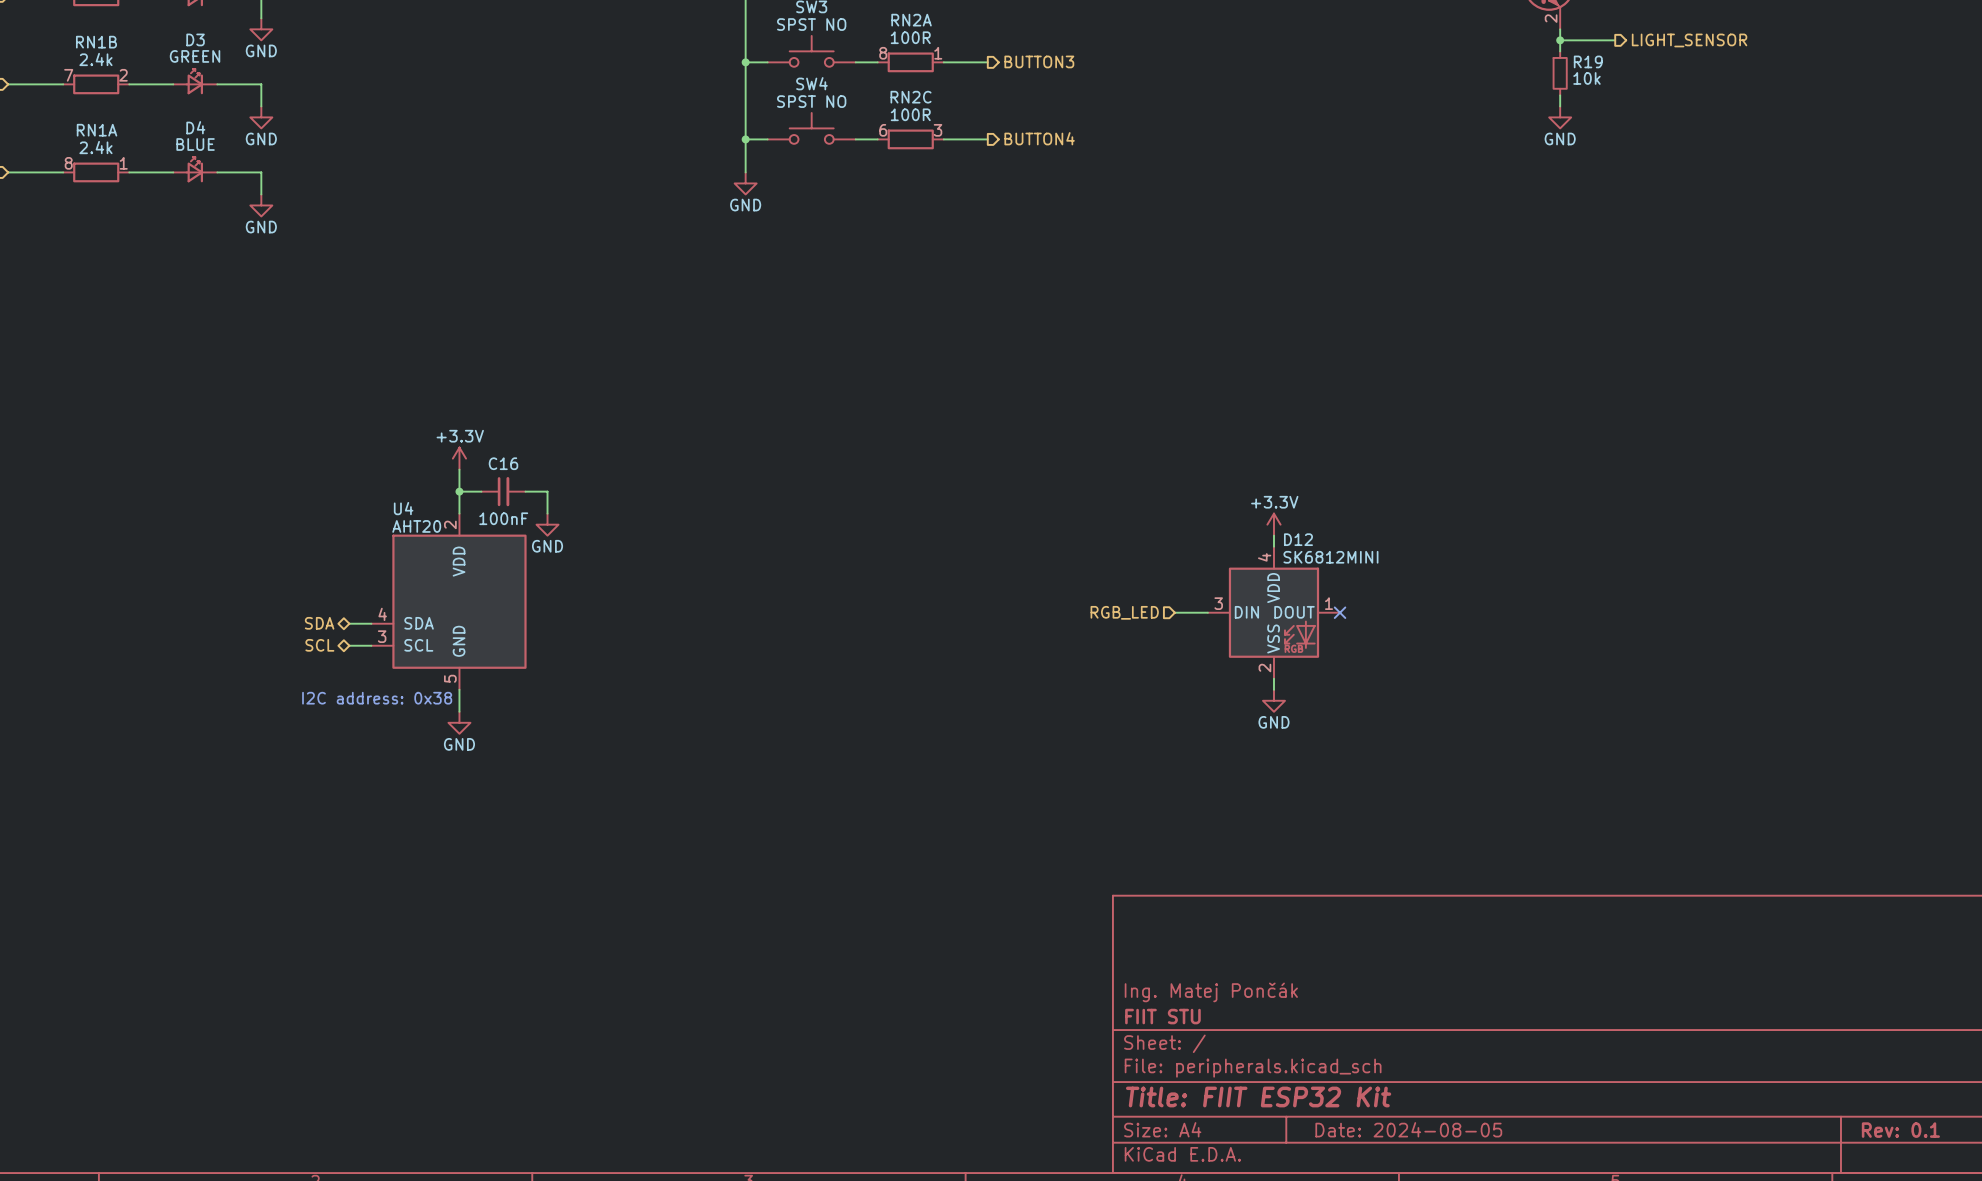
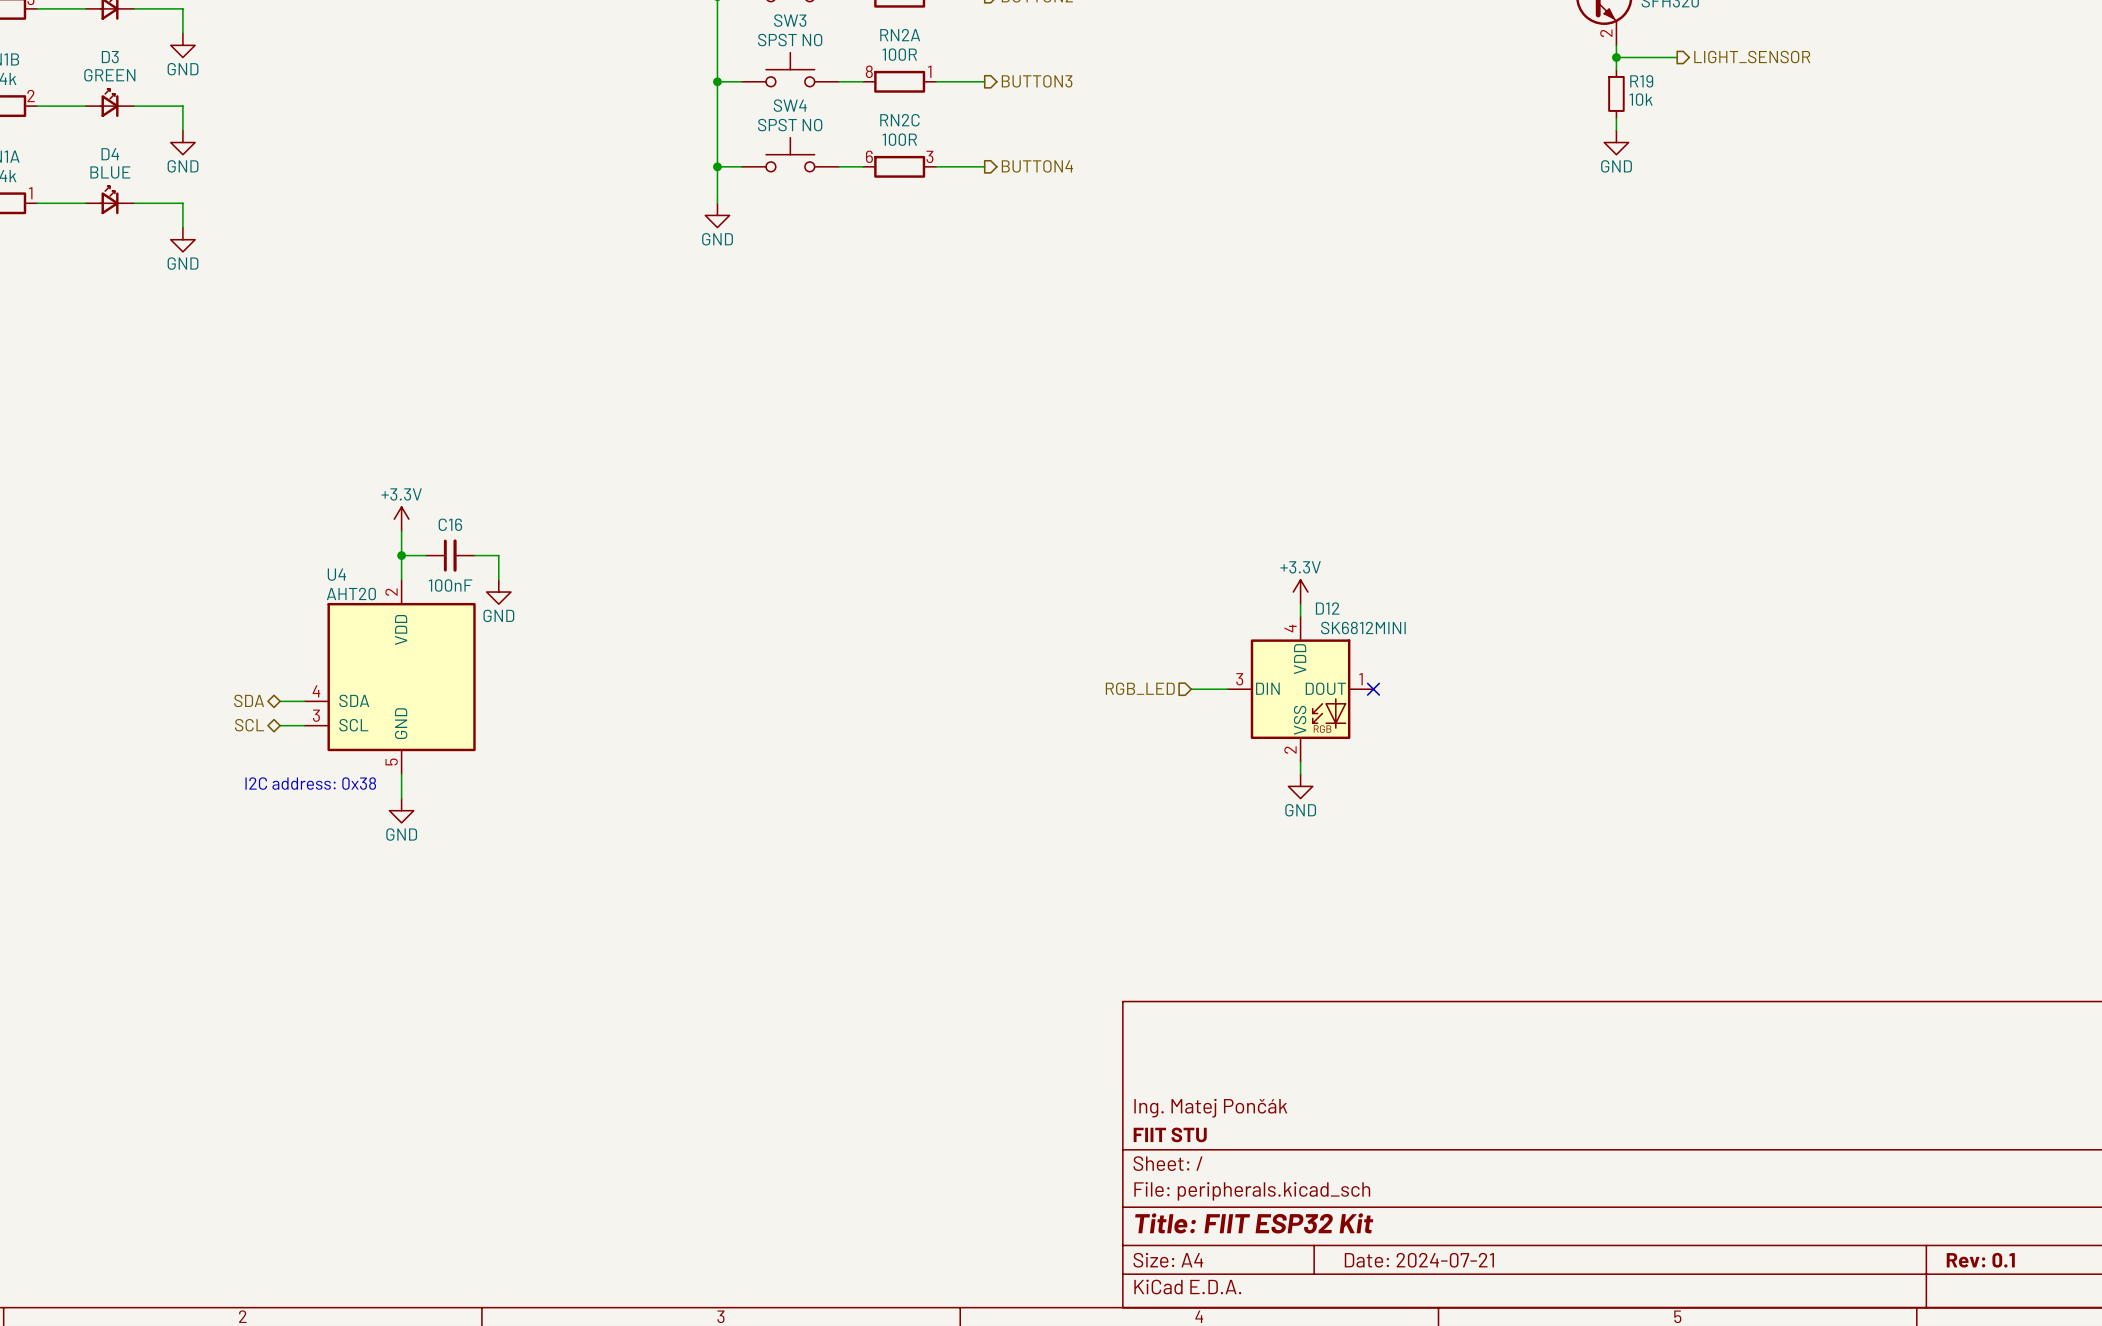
title block: Date: 2024-08-05 (1408, 1129) -> Date: 2024-07-21 (1419, 1260)

